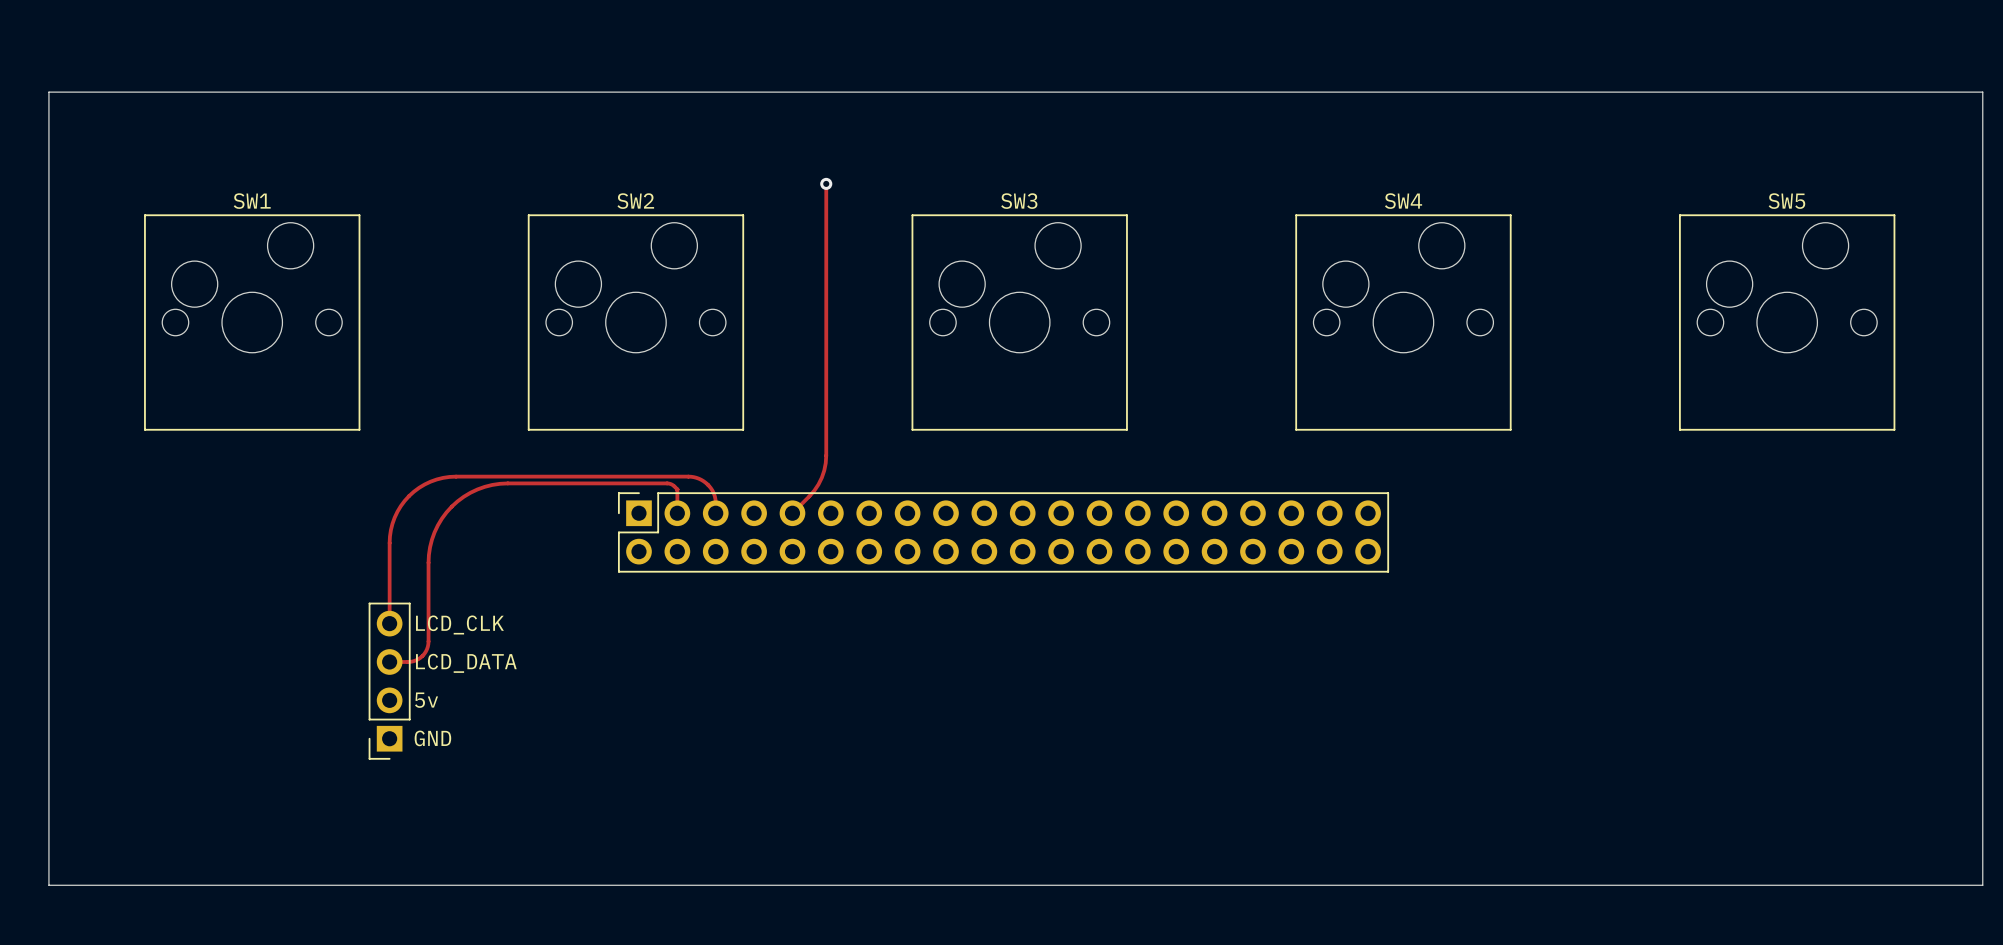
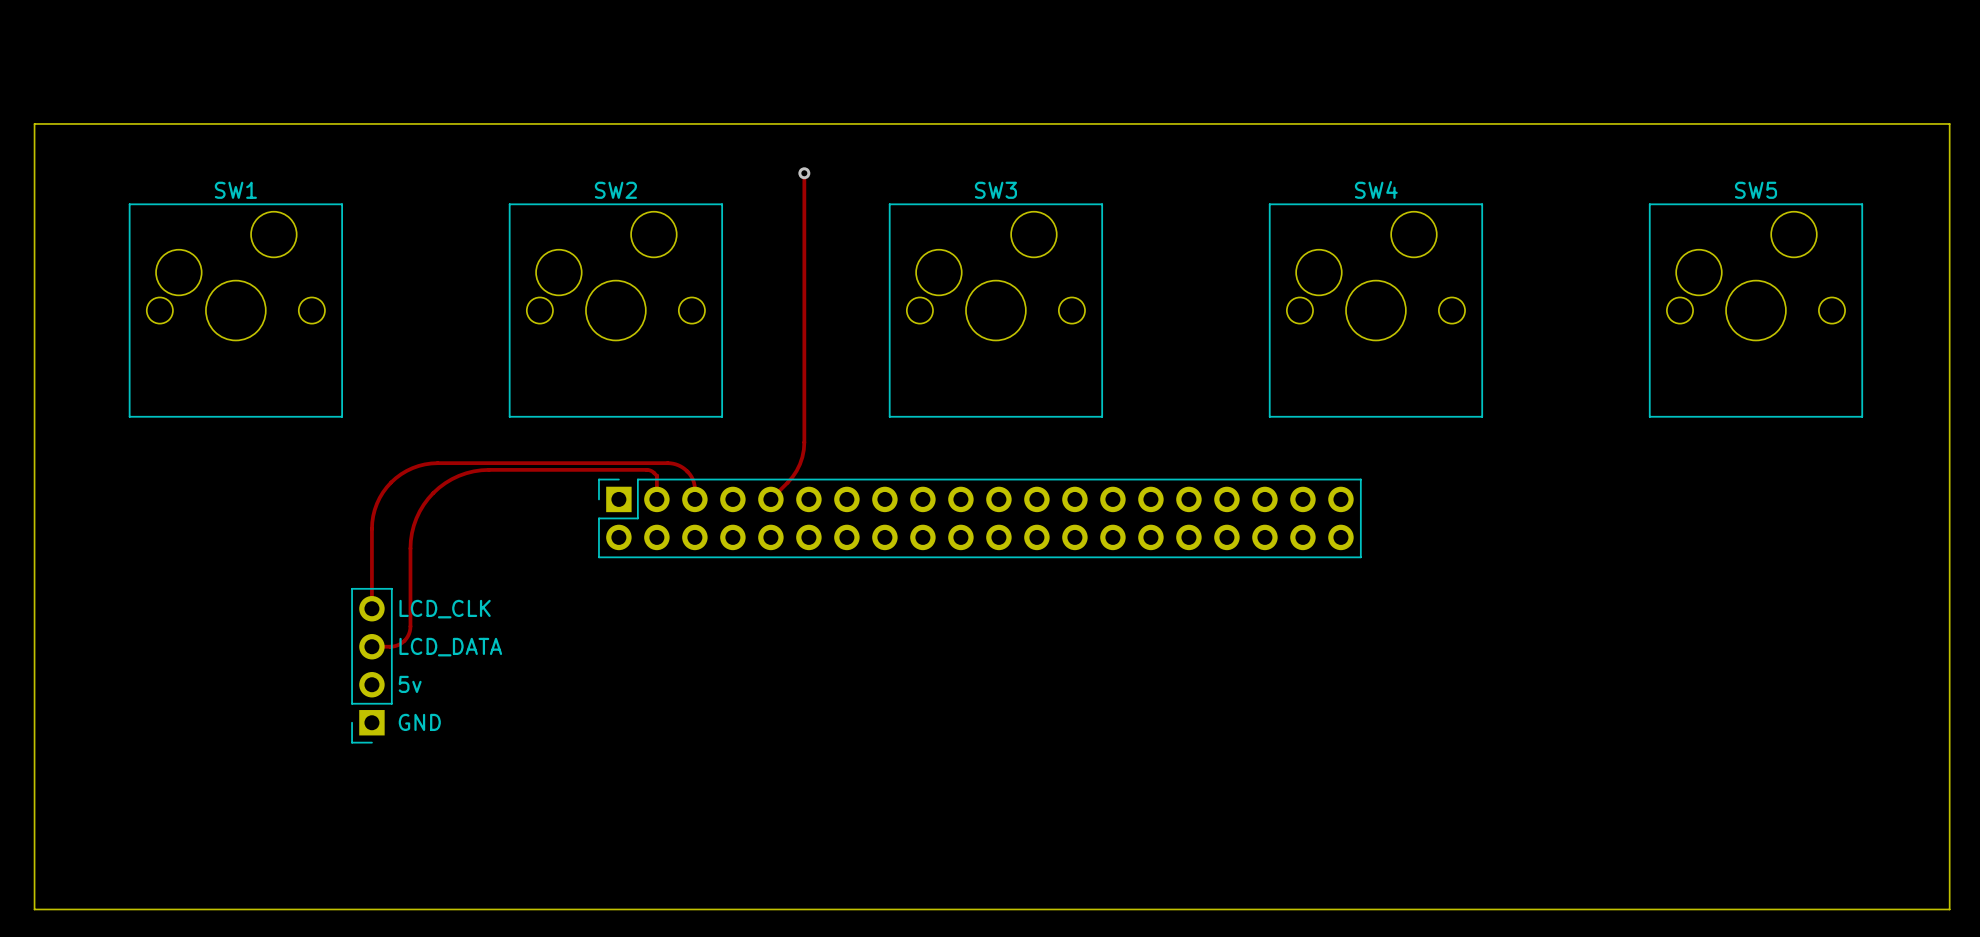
board edge: (48, 134) (48, 92) (1982, 92) (1982, 134) -> (34, 123) (1949, 123)
board edge: (48, 885) (1982, 885) -> (34, 867) (34, 909) (1949, 909) (1949, 867)

